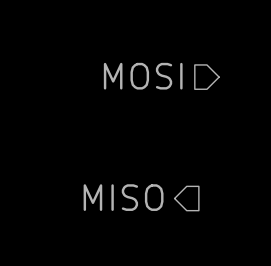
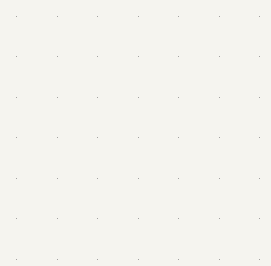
hierarchical label: MOSI (143, 76) -> none
hierarchical label: MISO (123, 197) -> none

